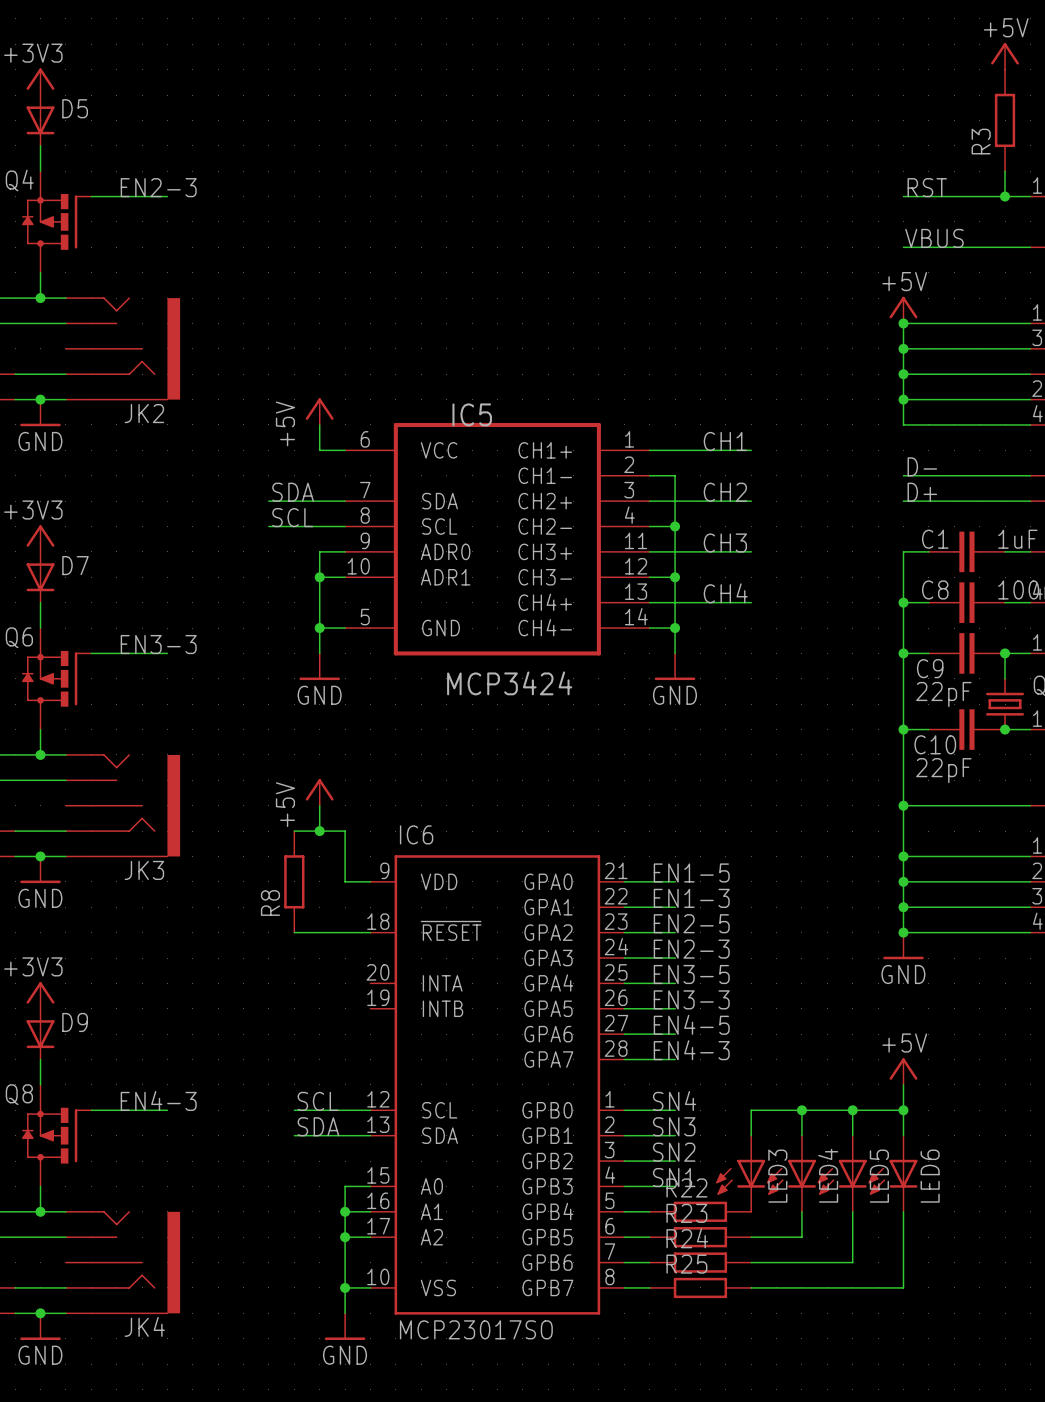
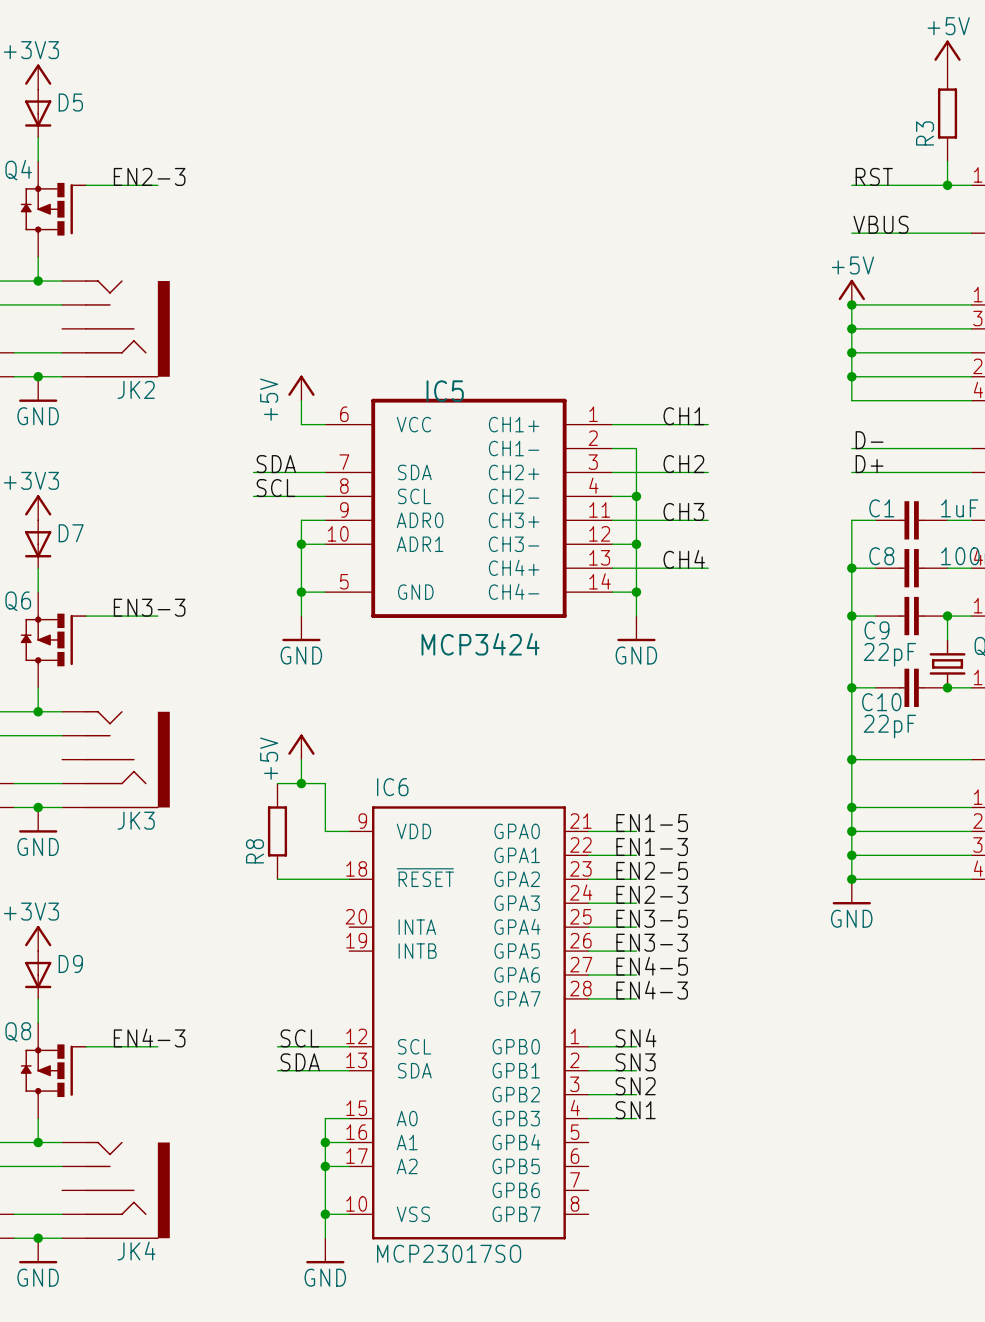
power symbol: +5V (903, 1071) -> none
wire: (903, 1084) (903, 1135) -> none
wire: (801, 1110) (801, 1135) -> none
junction: (801, 1110) -> none
wire: (852, 1110) (852, 1135) -> none
junction: (852, 1110) -> none
wire: (903, 1110) (751, 1110) (751, 1135) -> none
junction: (903, 1110) -> none
LED3: (740, 1173) -> none
LED4: (791, 1173) -> none
LED5: (842, 1173) -> none
LED6: (892, 1173) -> none
wire: (624, 1211) (649, 1211) -> none
R22: (700, 1211) -> none
wire: (801, 1211) (801, 1237) (751, 1237) -> none
wire: (852, 1211) (852, 1262) (751, 1262) -> none
wire: (903, 1211) (903, 1287) (751, 1287) -> none
wire: (624, 1237) (649, 1237) -> none
R23: (700, 1237) -> none
wire: (624, 1262) (649, 1262) -> none
R24: (700, 1262) -> none
wire: (624, 1287) (649, 1287) -> none
R25: (700, 1287) -> none

